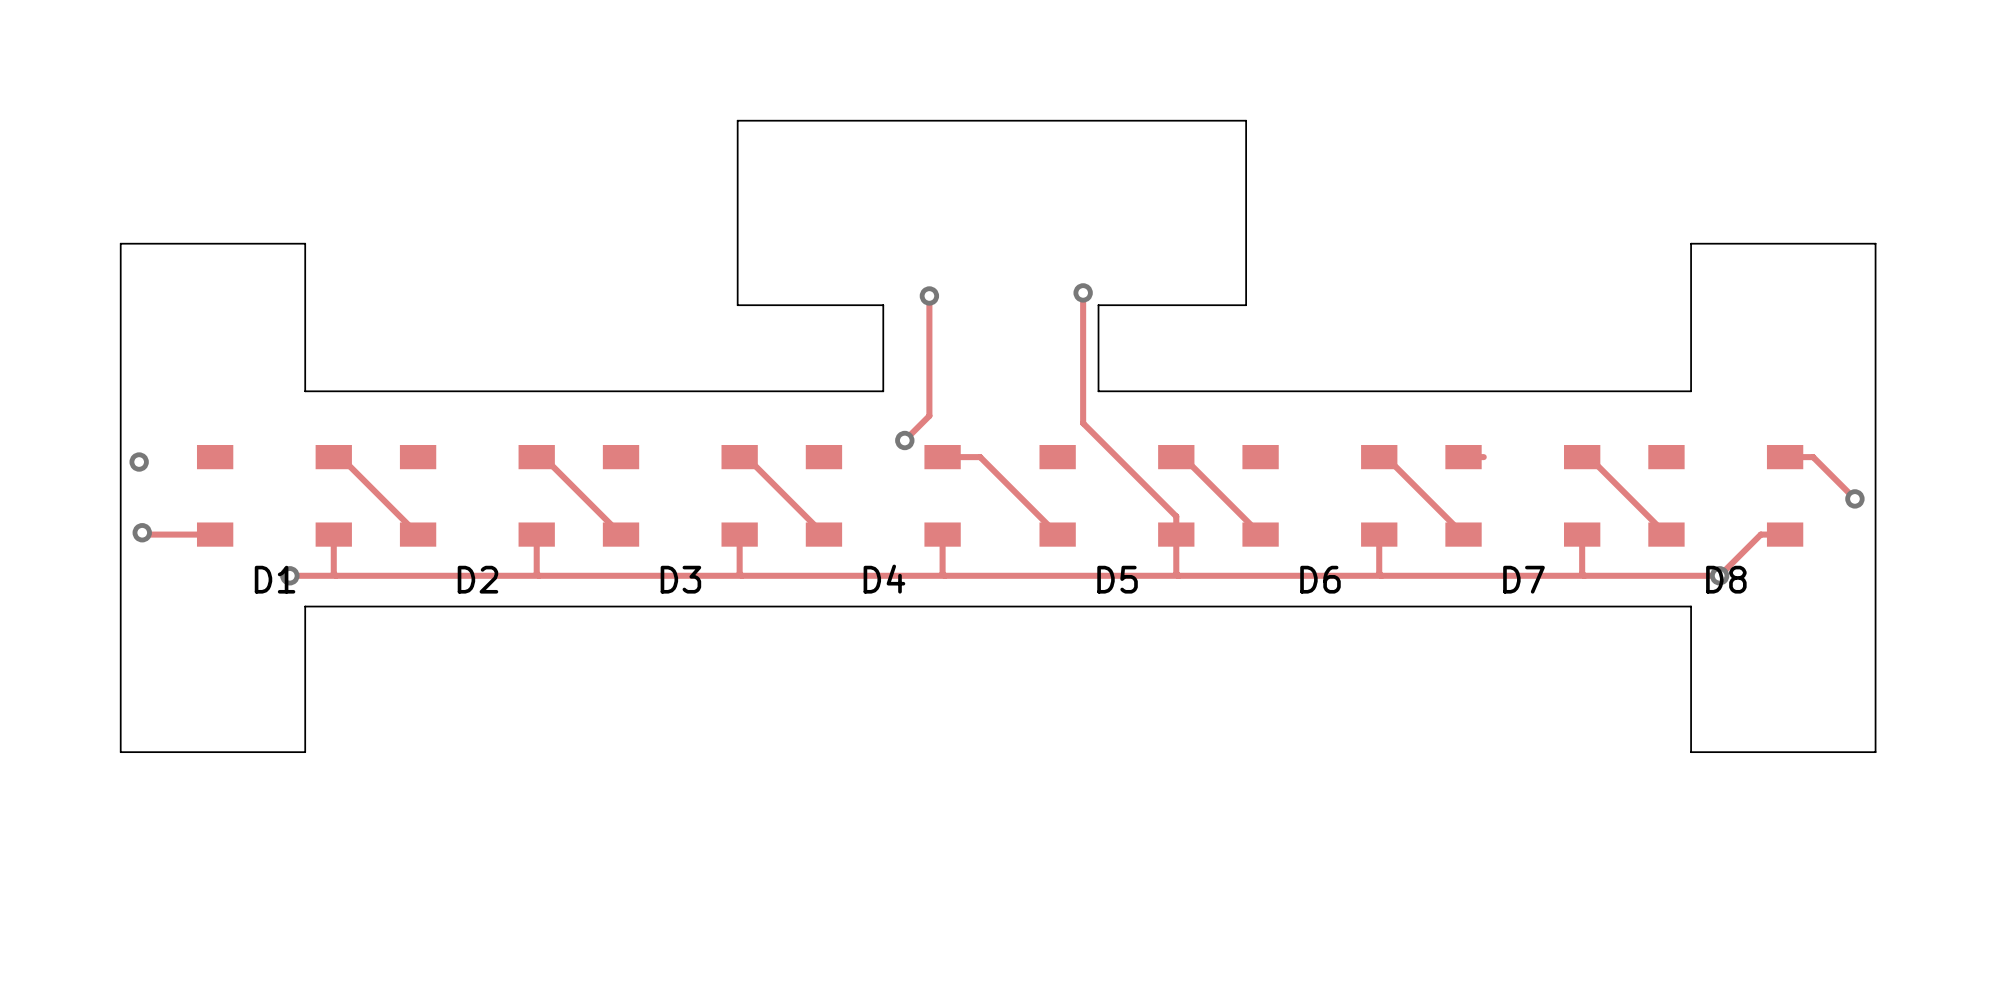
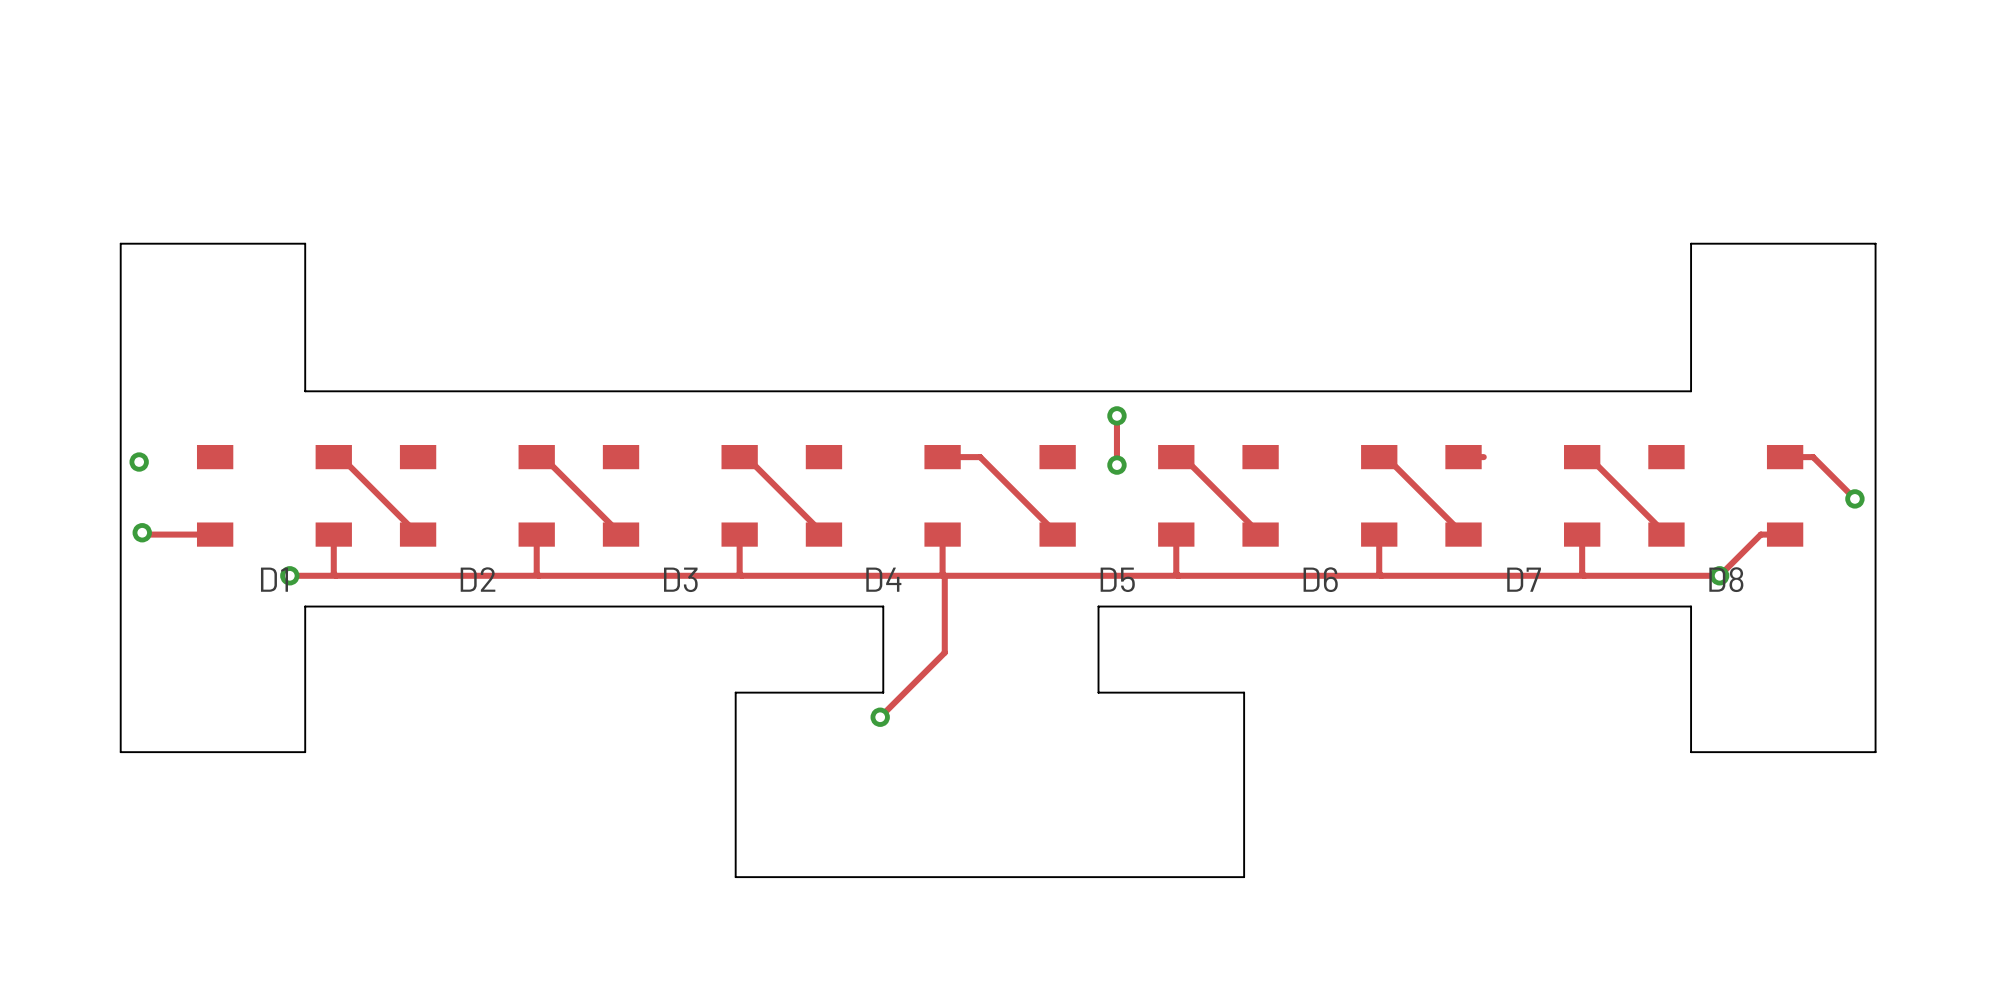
track: (1083, 292) (1083, 423) (1176, 516) (1176, 534) -> none
via: (1083, 292) -> none
track: (929, 295) (929, 415) (904, 440) -> none
via: (929, 295) -> none
board edge: (883, 391) (883, 305) (737, 305) (737, 120) (1246, 120) (1246, 305) (1098, 305) (1098, 391) -> (883, 391) (1098, 391)
via: none -> (1116, 415)
track: none -> (1116, 418) (1116, 465)
via: (904, 440) -> none
via: none -> (1116, 465)
track: none -> (944, 575) (944, 652) (880, 717)
board edge: (883, 606) (1098, 606) -> (883, 606) (883, 692) (735, 692) (735, 877) (1244, 877) (1244, 692) (1098, 692) (1098, 606)
via: none -> (880, 717)

